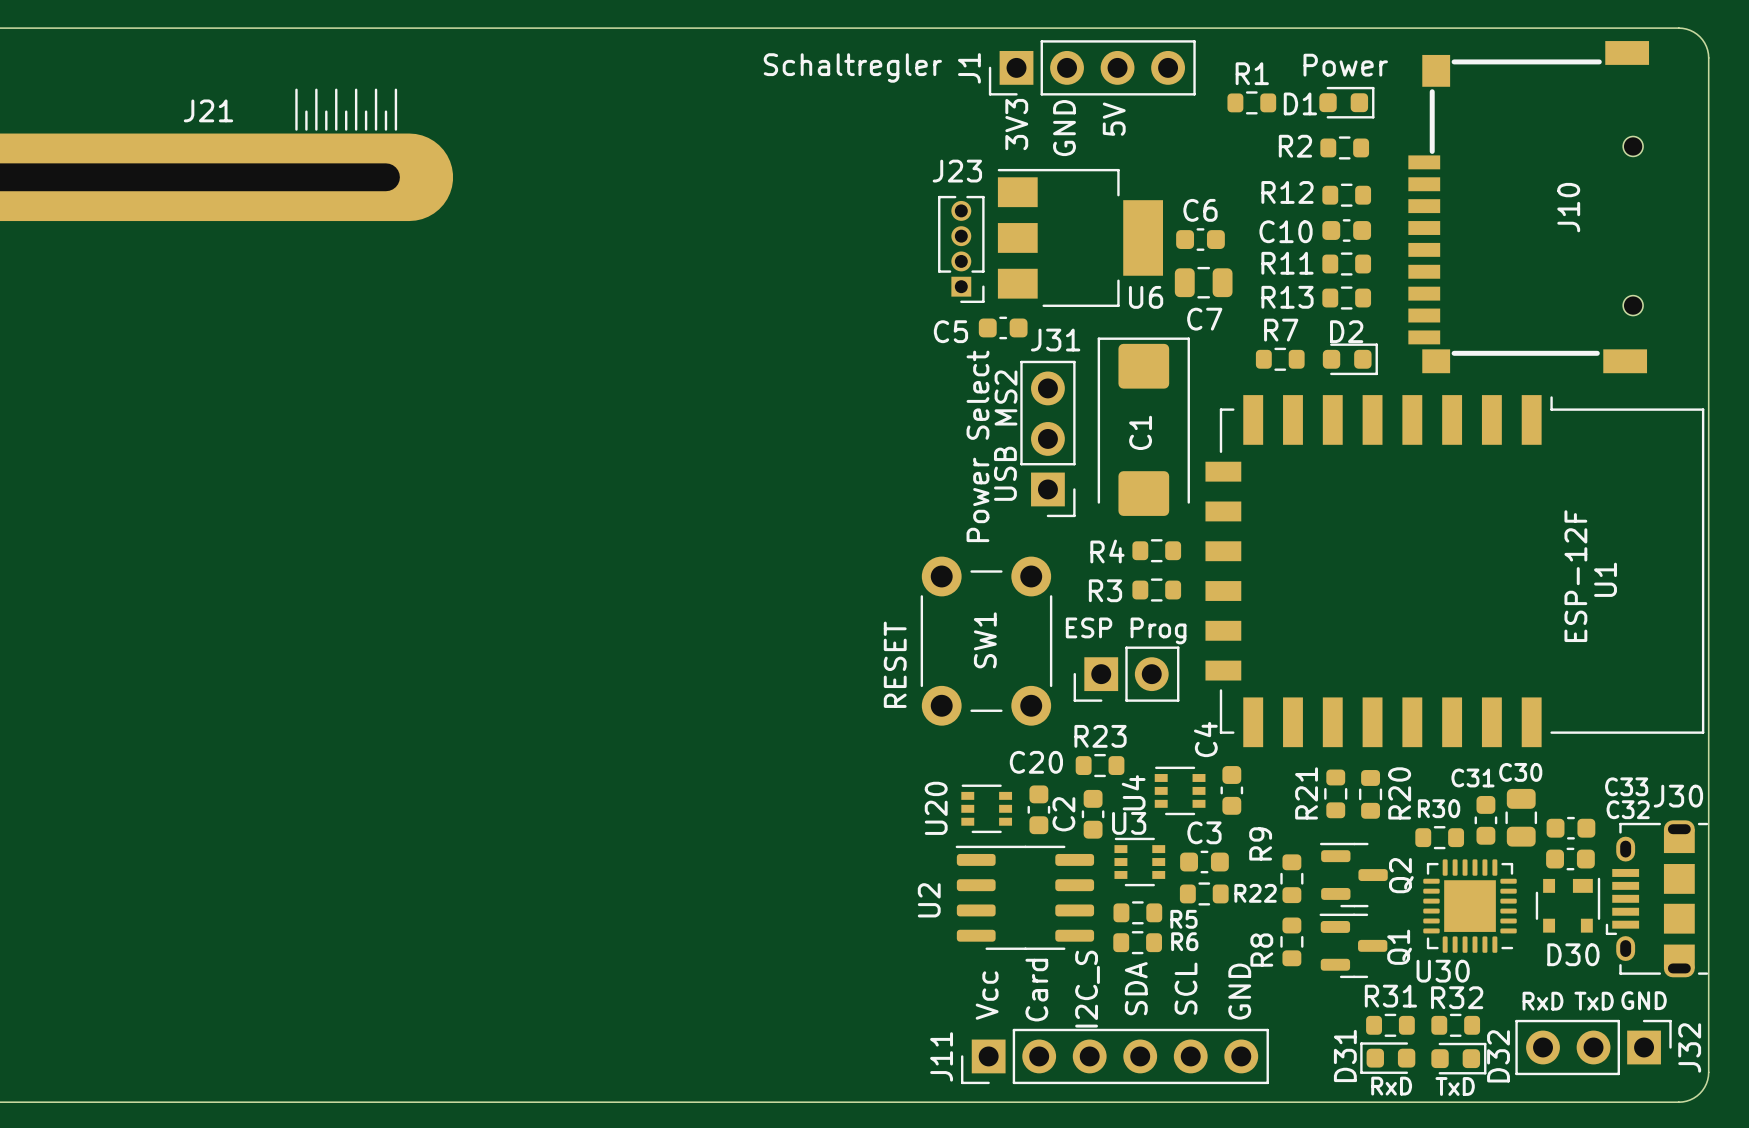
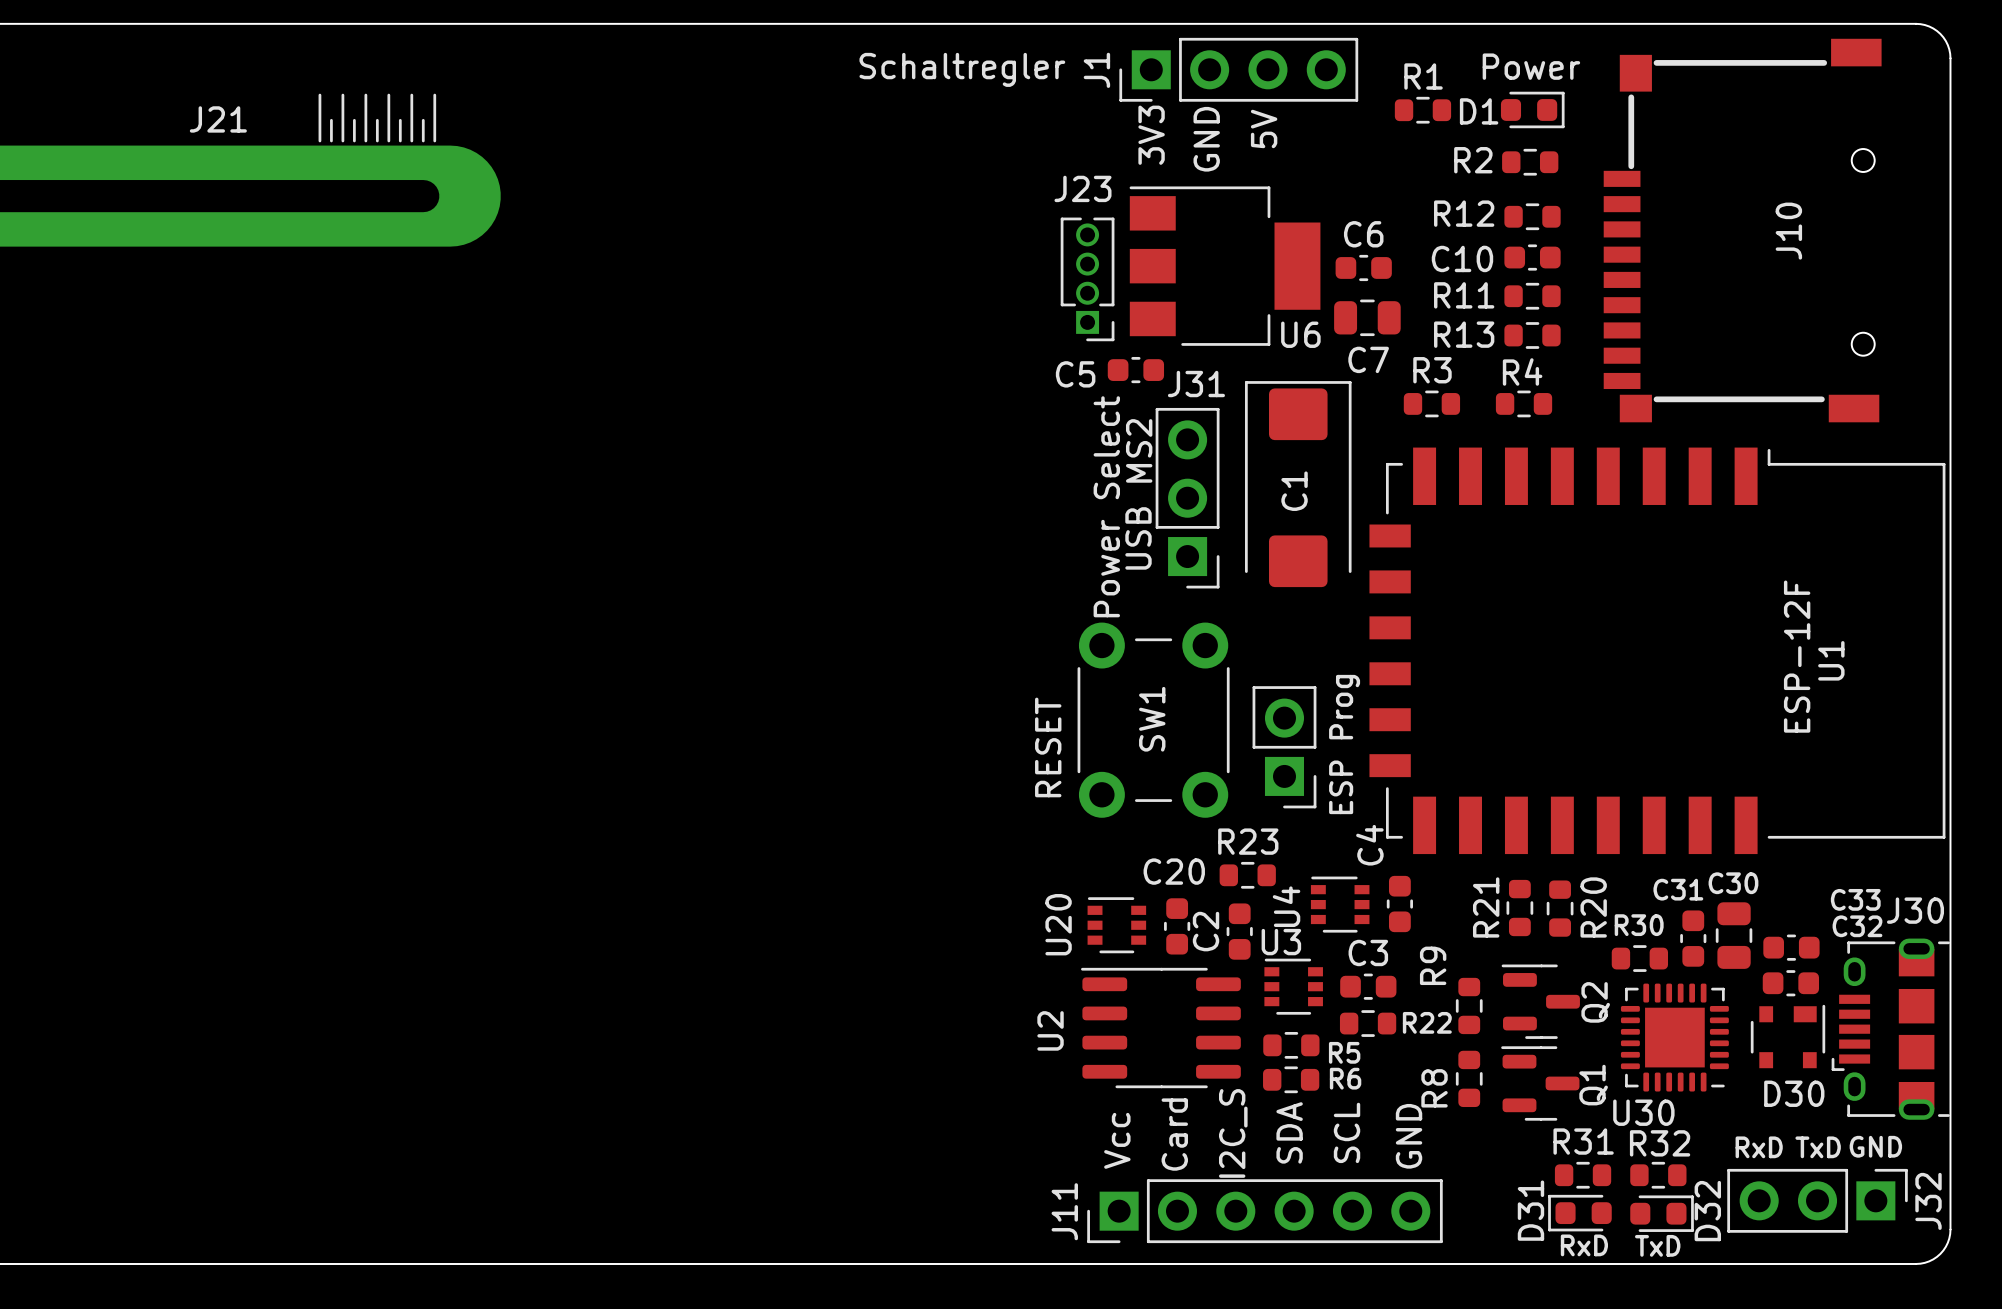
R7: (1280, 359) -> none
D2: (1350, 359) -> none
R4 position: (1156, 550) -> (1524, 403)
R4 name position: R4 (1107, 551) -> R4 (1522, 371)
R3 name position: R3 (1105, 590) -> R3 (1432, 370)
R3 position: (1156, 590) -> (1431, 403)
part value position: ESP Prog (1126, 630) -> ESP Prog (1344, 744)
SW1 position: (986, 641) -> (1153, 720)
part rotation: 0° (1126, 674) -> 90° counterclockwise (1284, 747)

